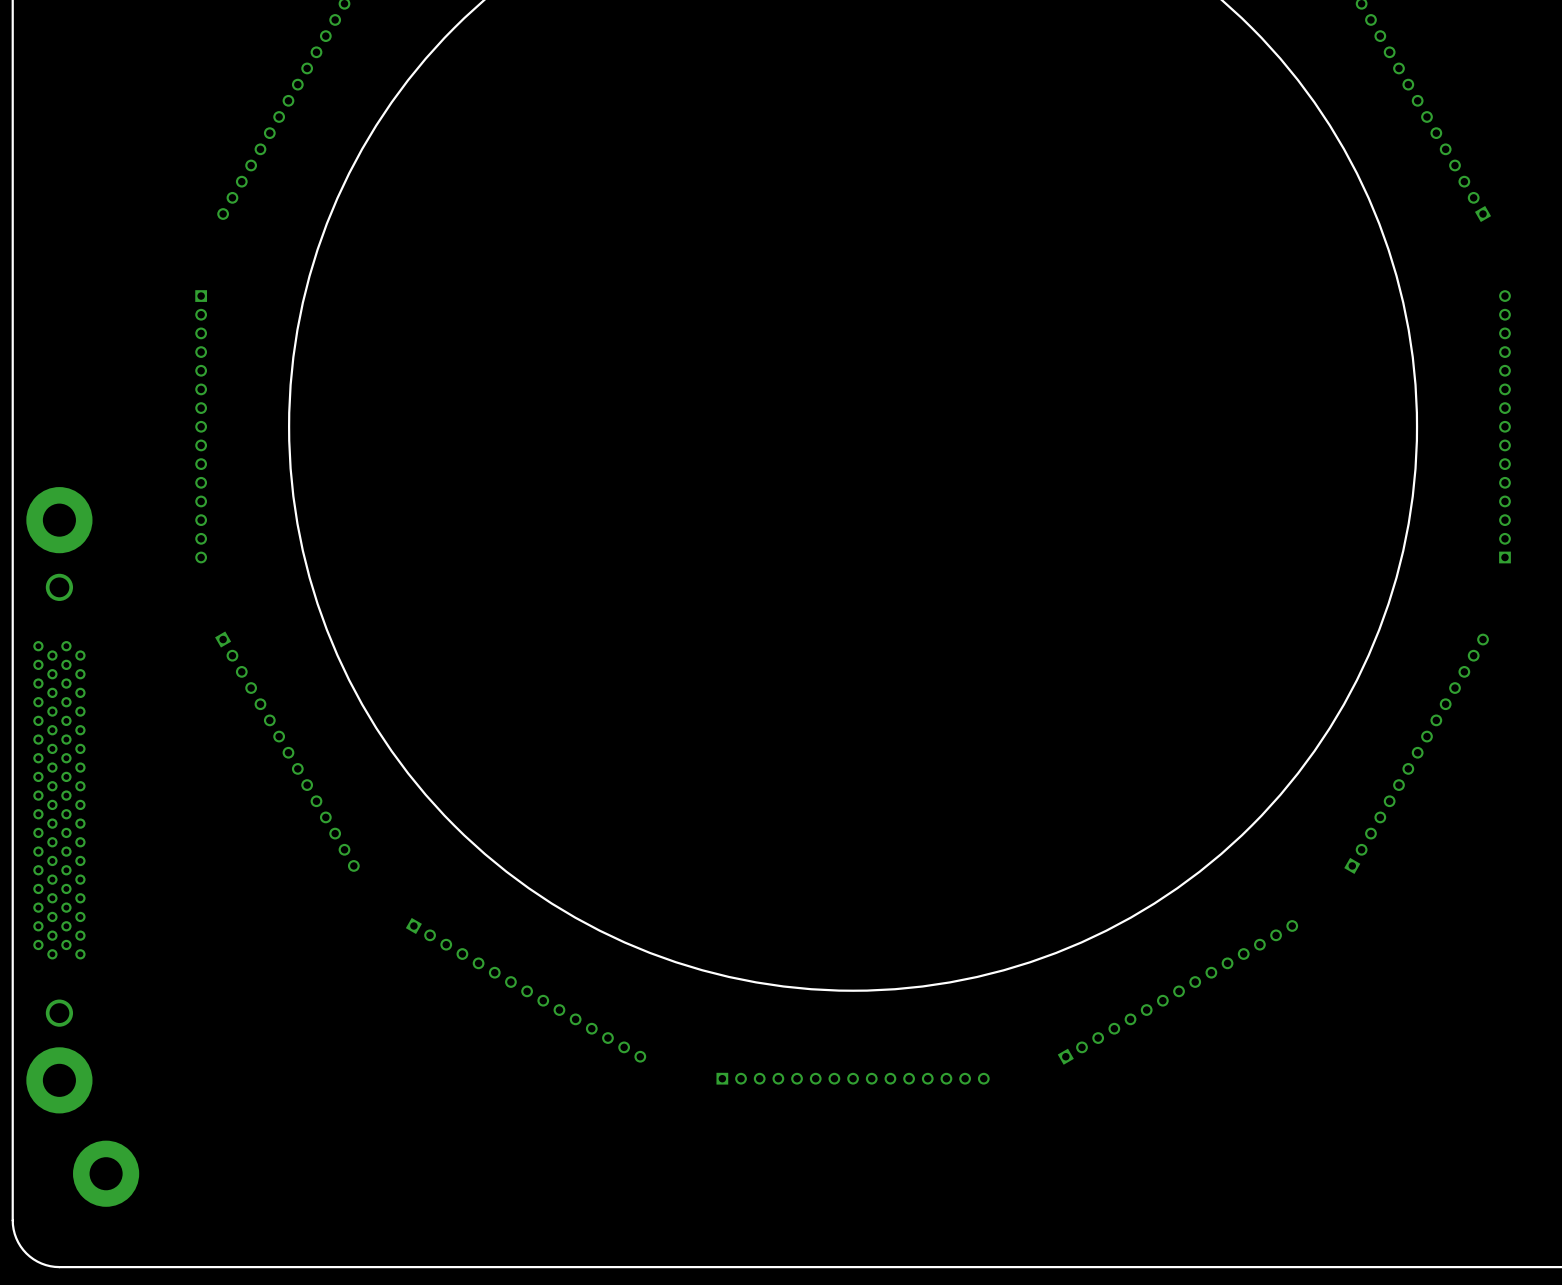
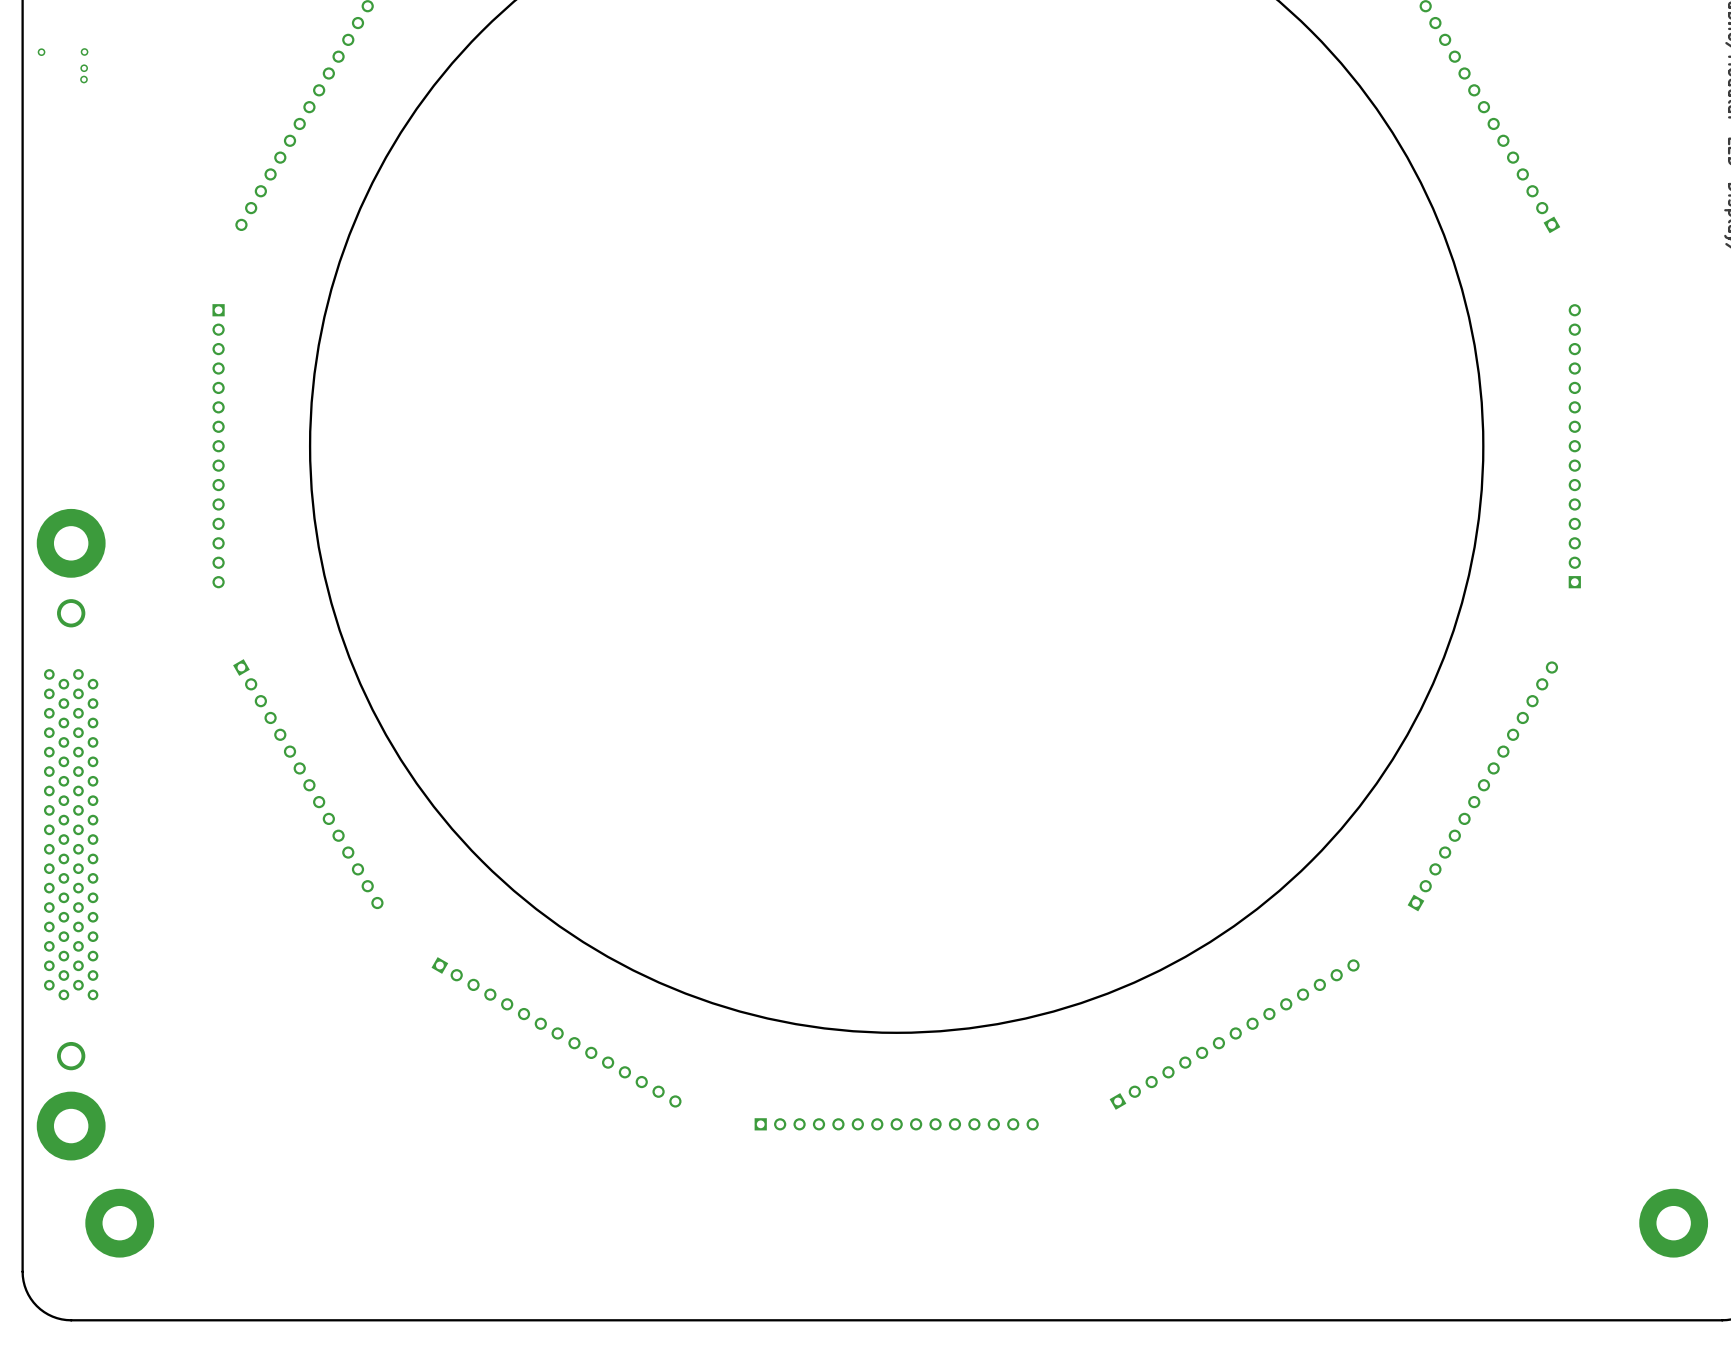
via: none -> (41, 52)
via: none -> (84, 51)
via: none -> (84, 68)
via: none -> (83, 79)

